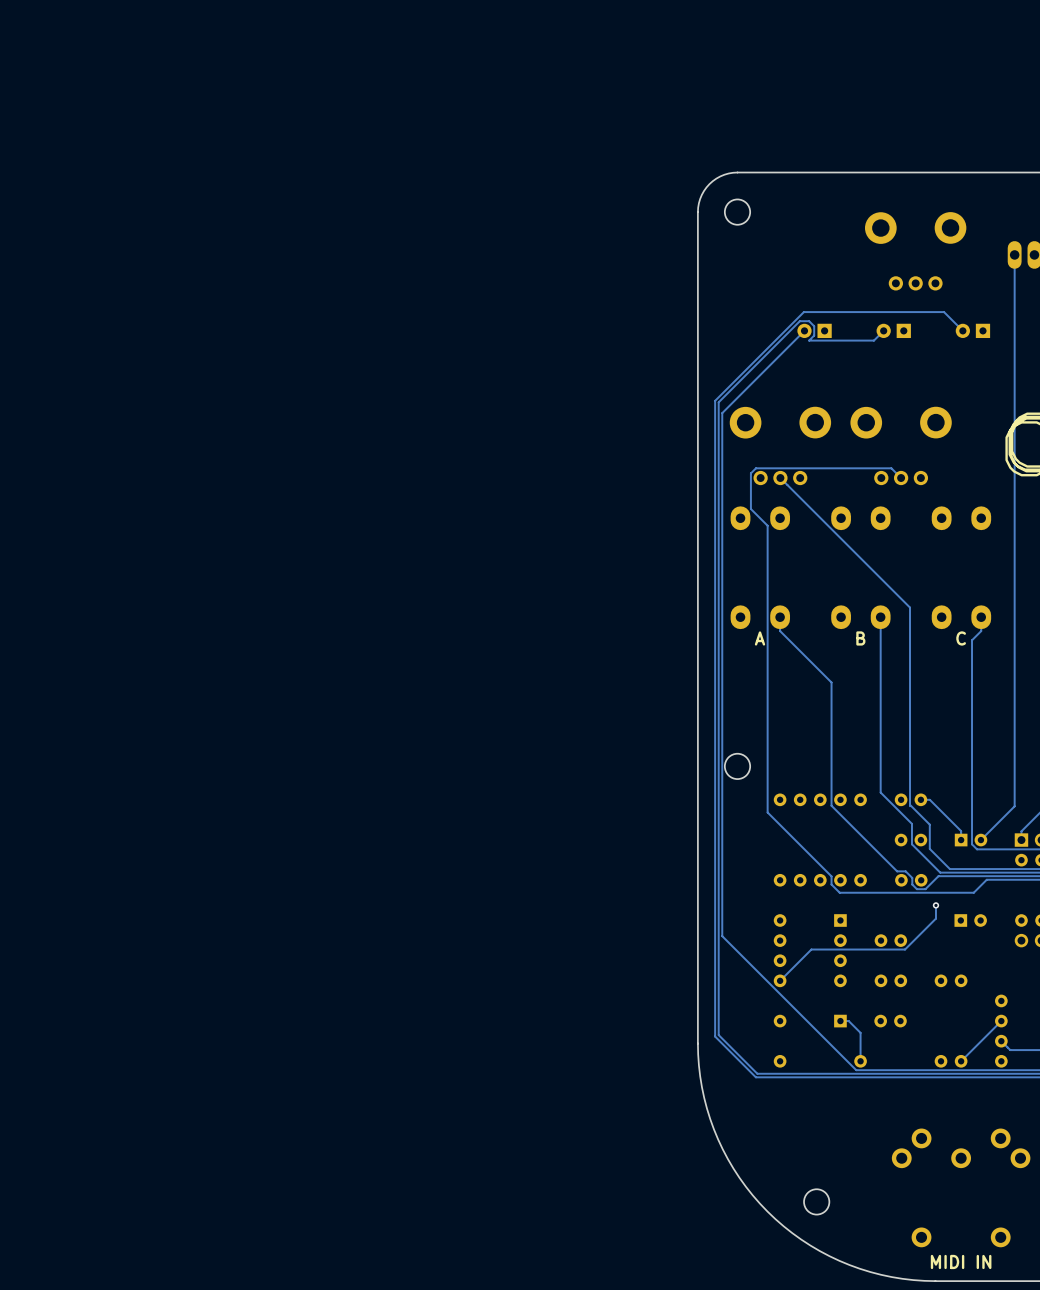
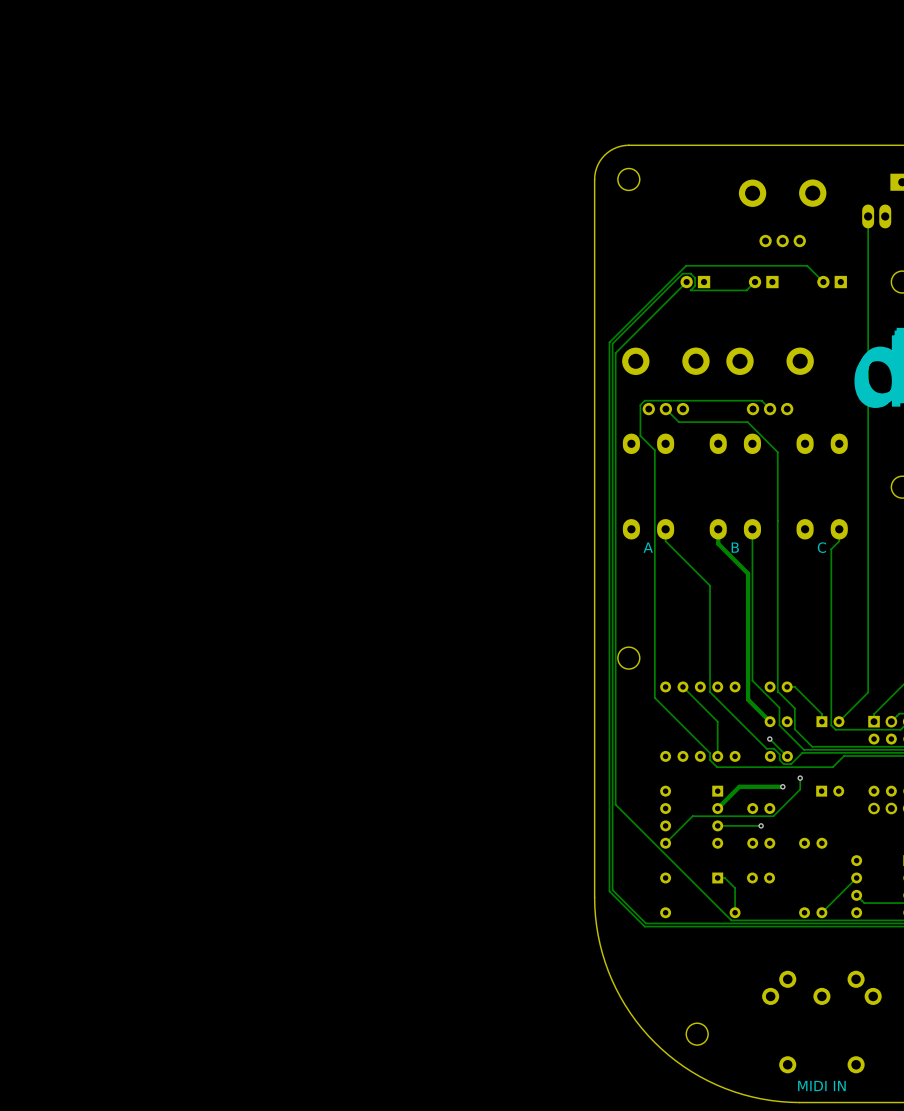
track: (795, 493) (910, 607) -> (678, 422) (747, 422) (777, 452) (777, 520)
track: none -> (718, 529) (718, 543) (748, 573) (748, 699) (770, 721)
track: none -> (682, 686) (717, 721) (717, 756)
track: none -> (769, 739) (787, 756)
via: none -> (769, 739)
track: none -> (782, 786) (739, 786) (717, 808)
via: none -> (782, 786)
track: none -> (761, 825) (717, 825)
via: none -> (761, 825)

